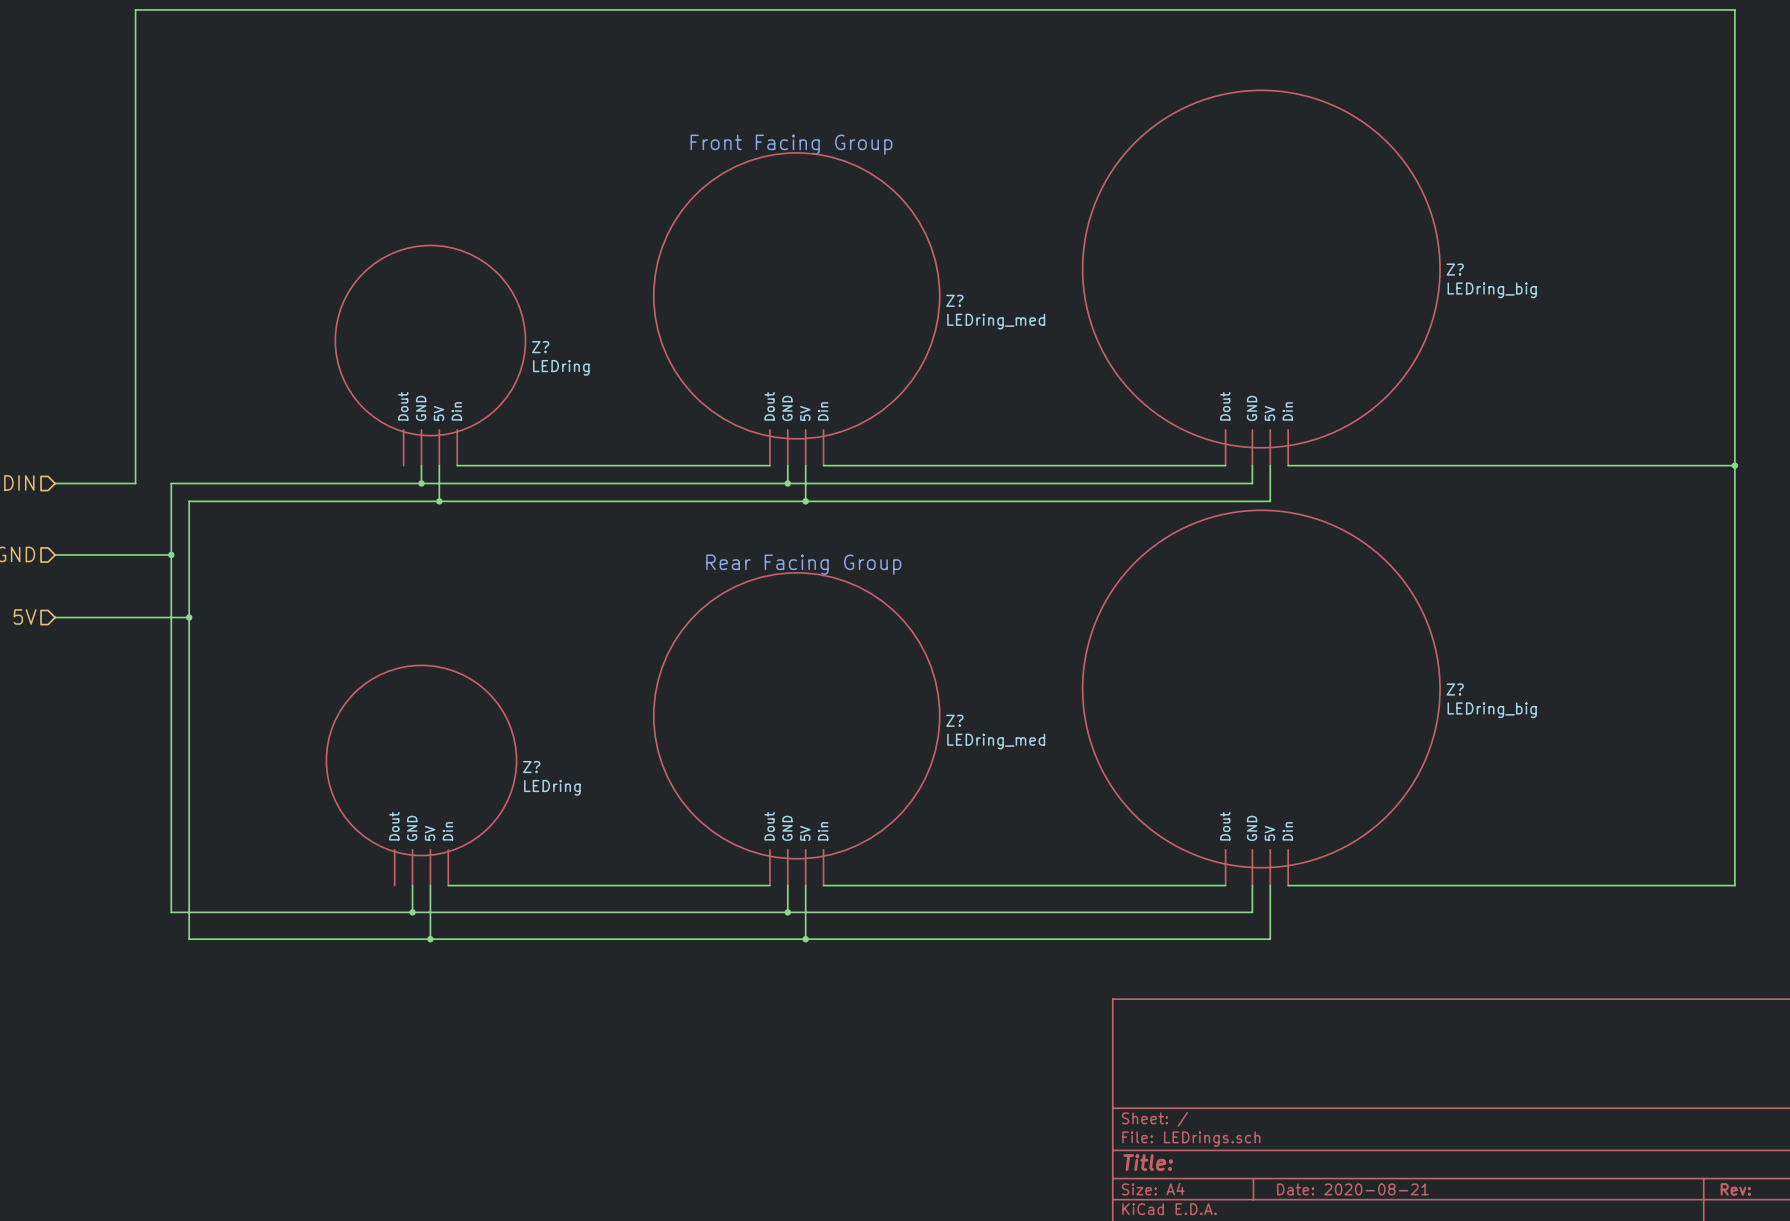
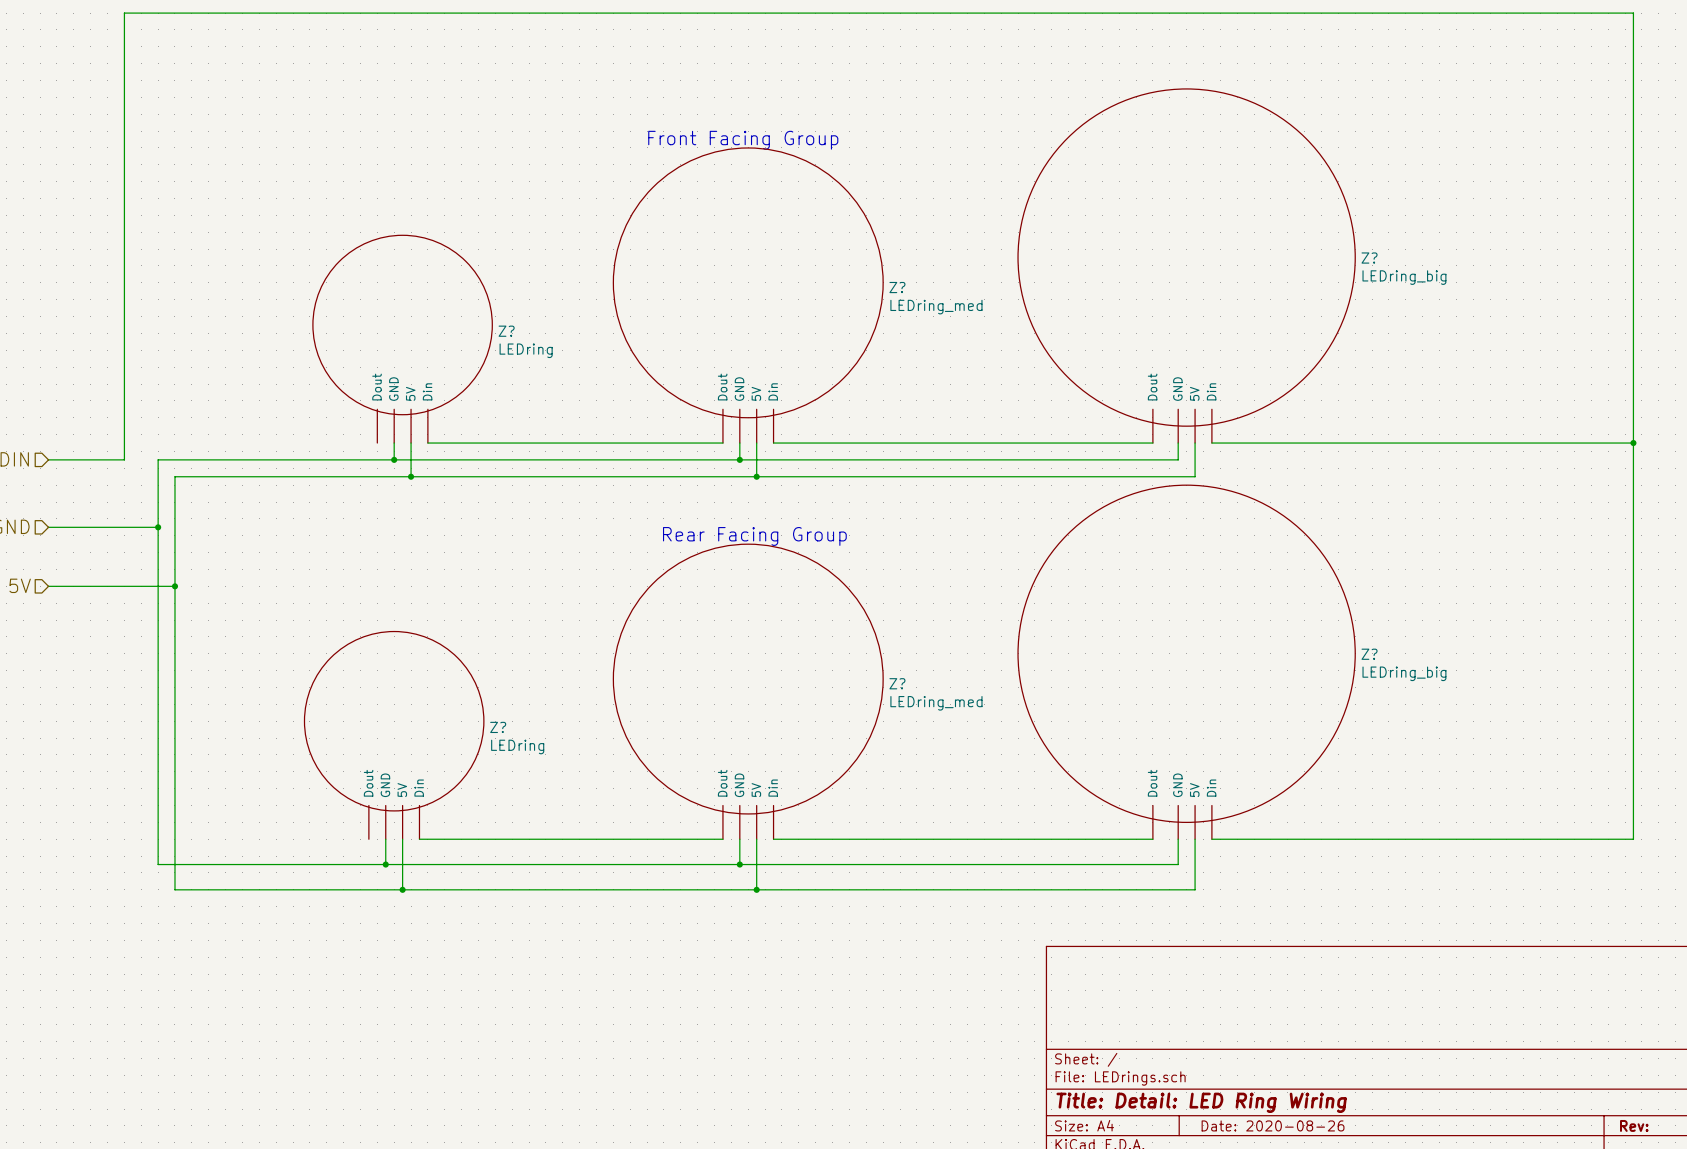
title block: Title: (1148, 1162) -> Title: Detail: LED Ring Wiring (1201, 1102)
title block: Date: 2020-08-21 (1352, 1189) -> Date: 2020-08-26 (1273, 1125)

